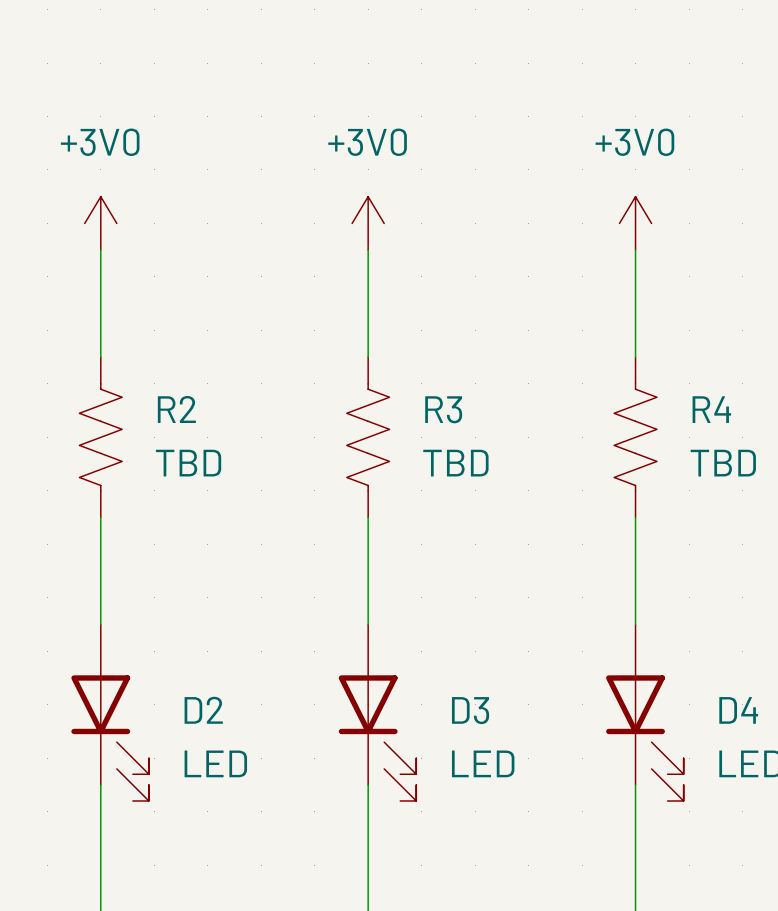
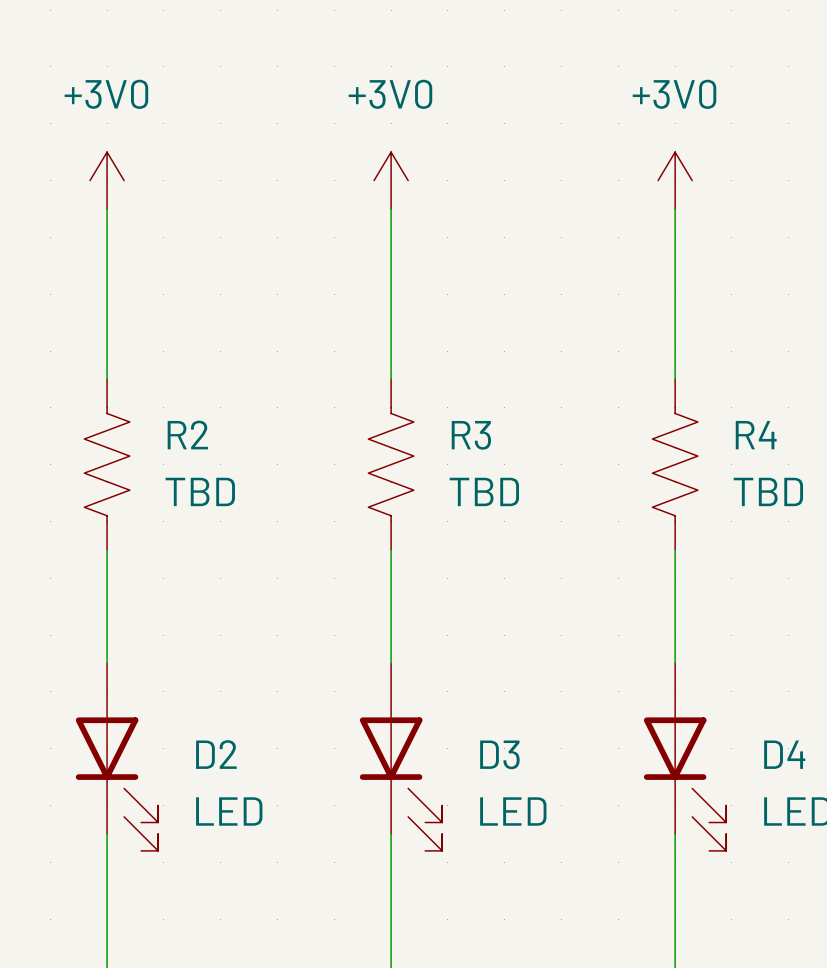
power symbol position: +3V0 (100, 223) -> +3V0 (107, 180)
power symbol position: +3V0 (368, 223) -> +3V0 (391, 180)
power symbol position: +3V0 (635, 223) -> +3V0 (675, 180)

